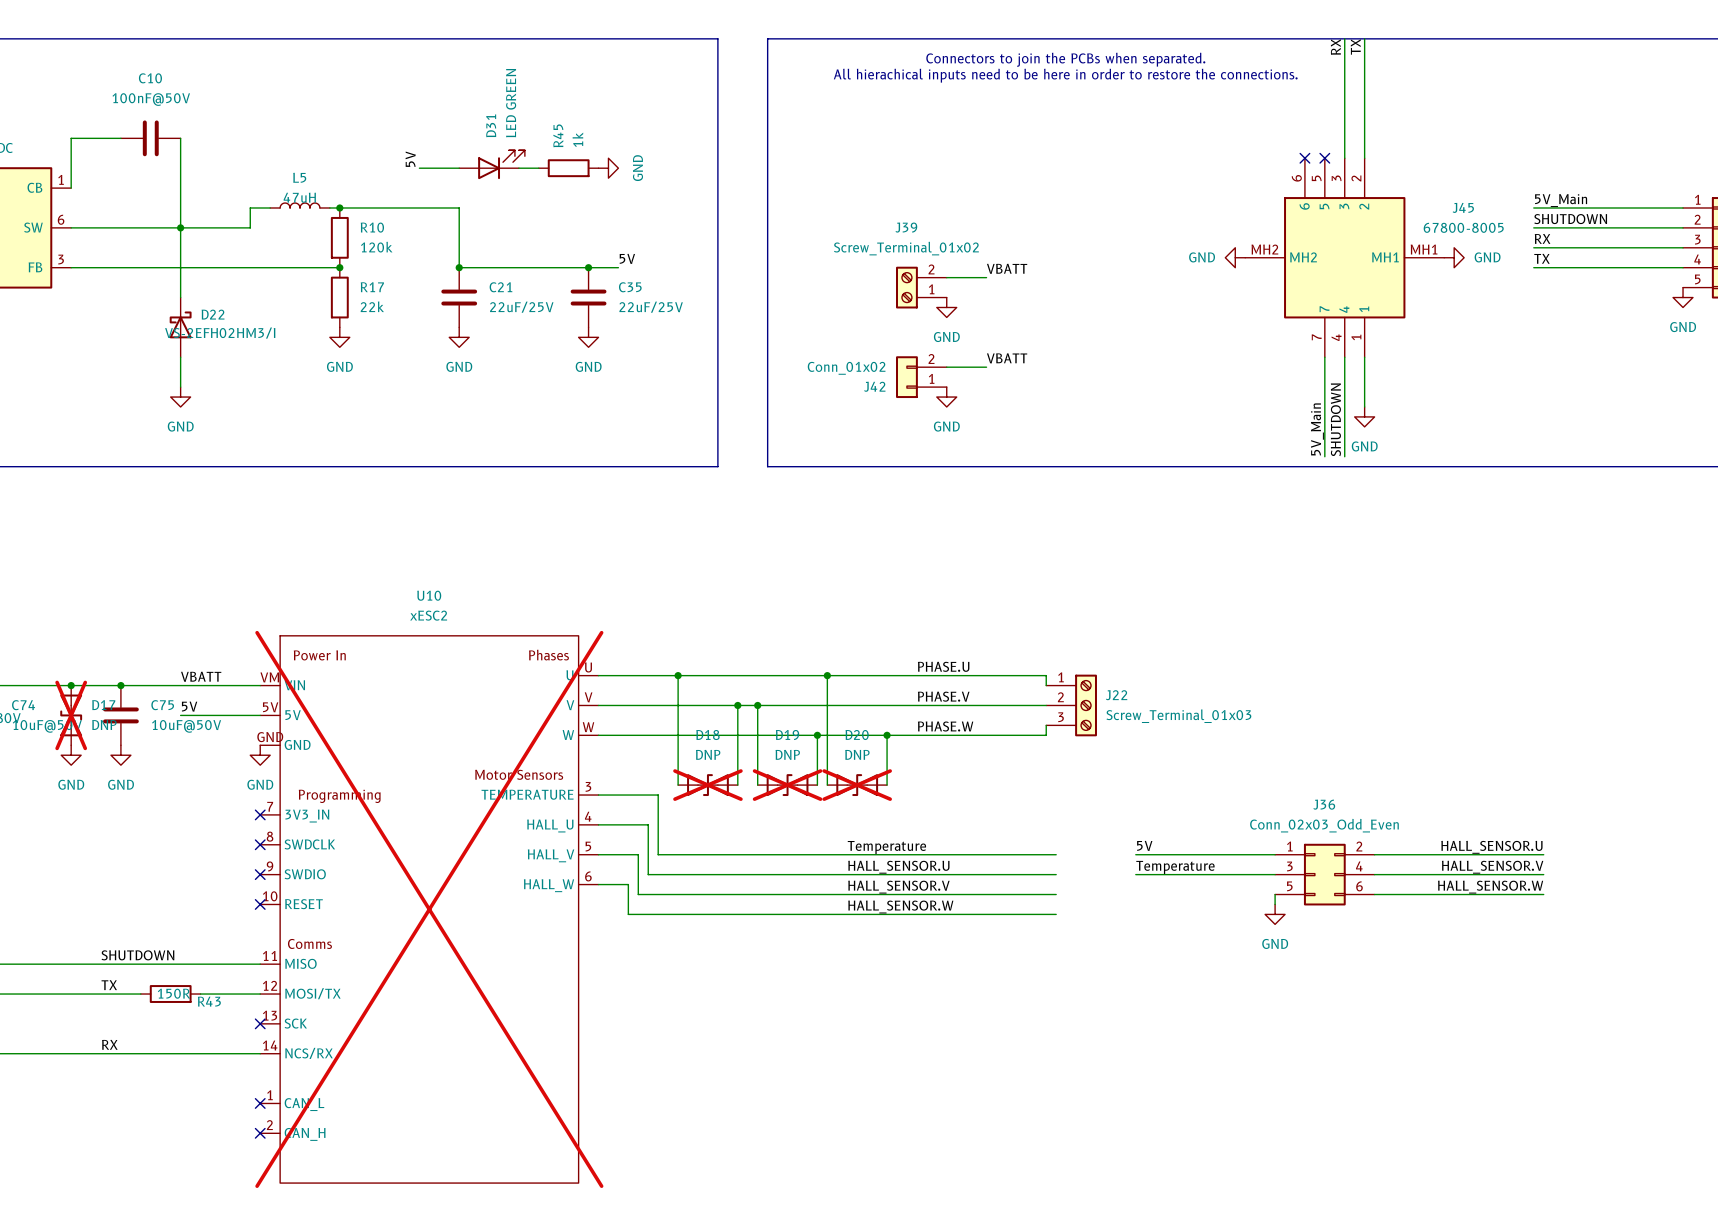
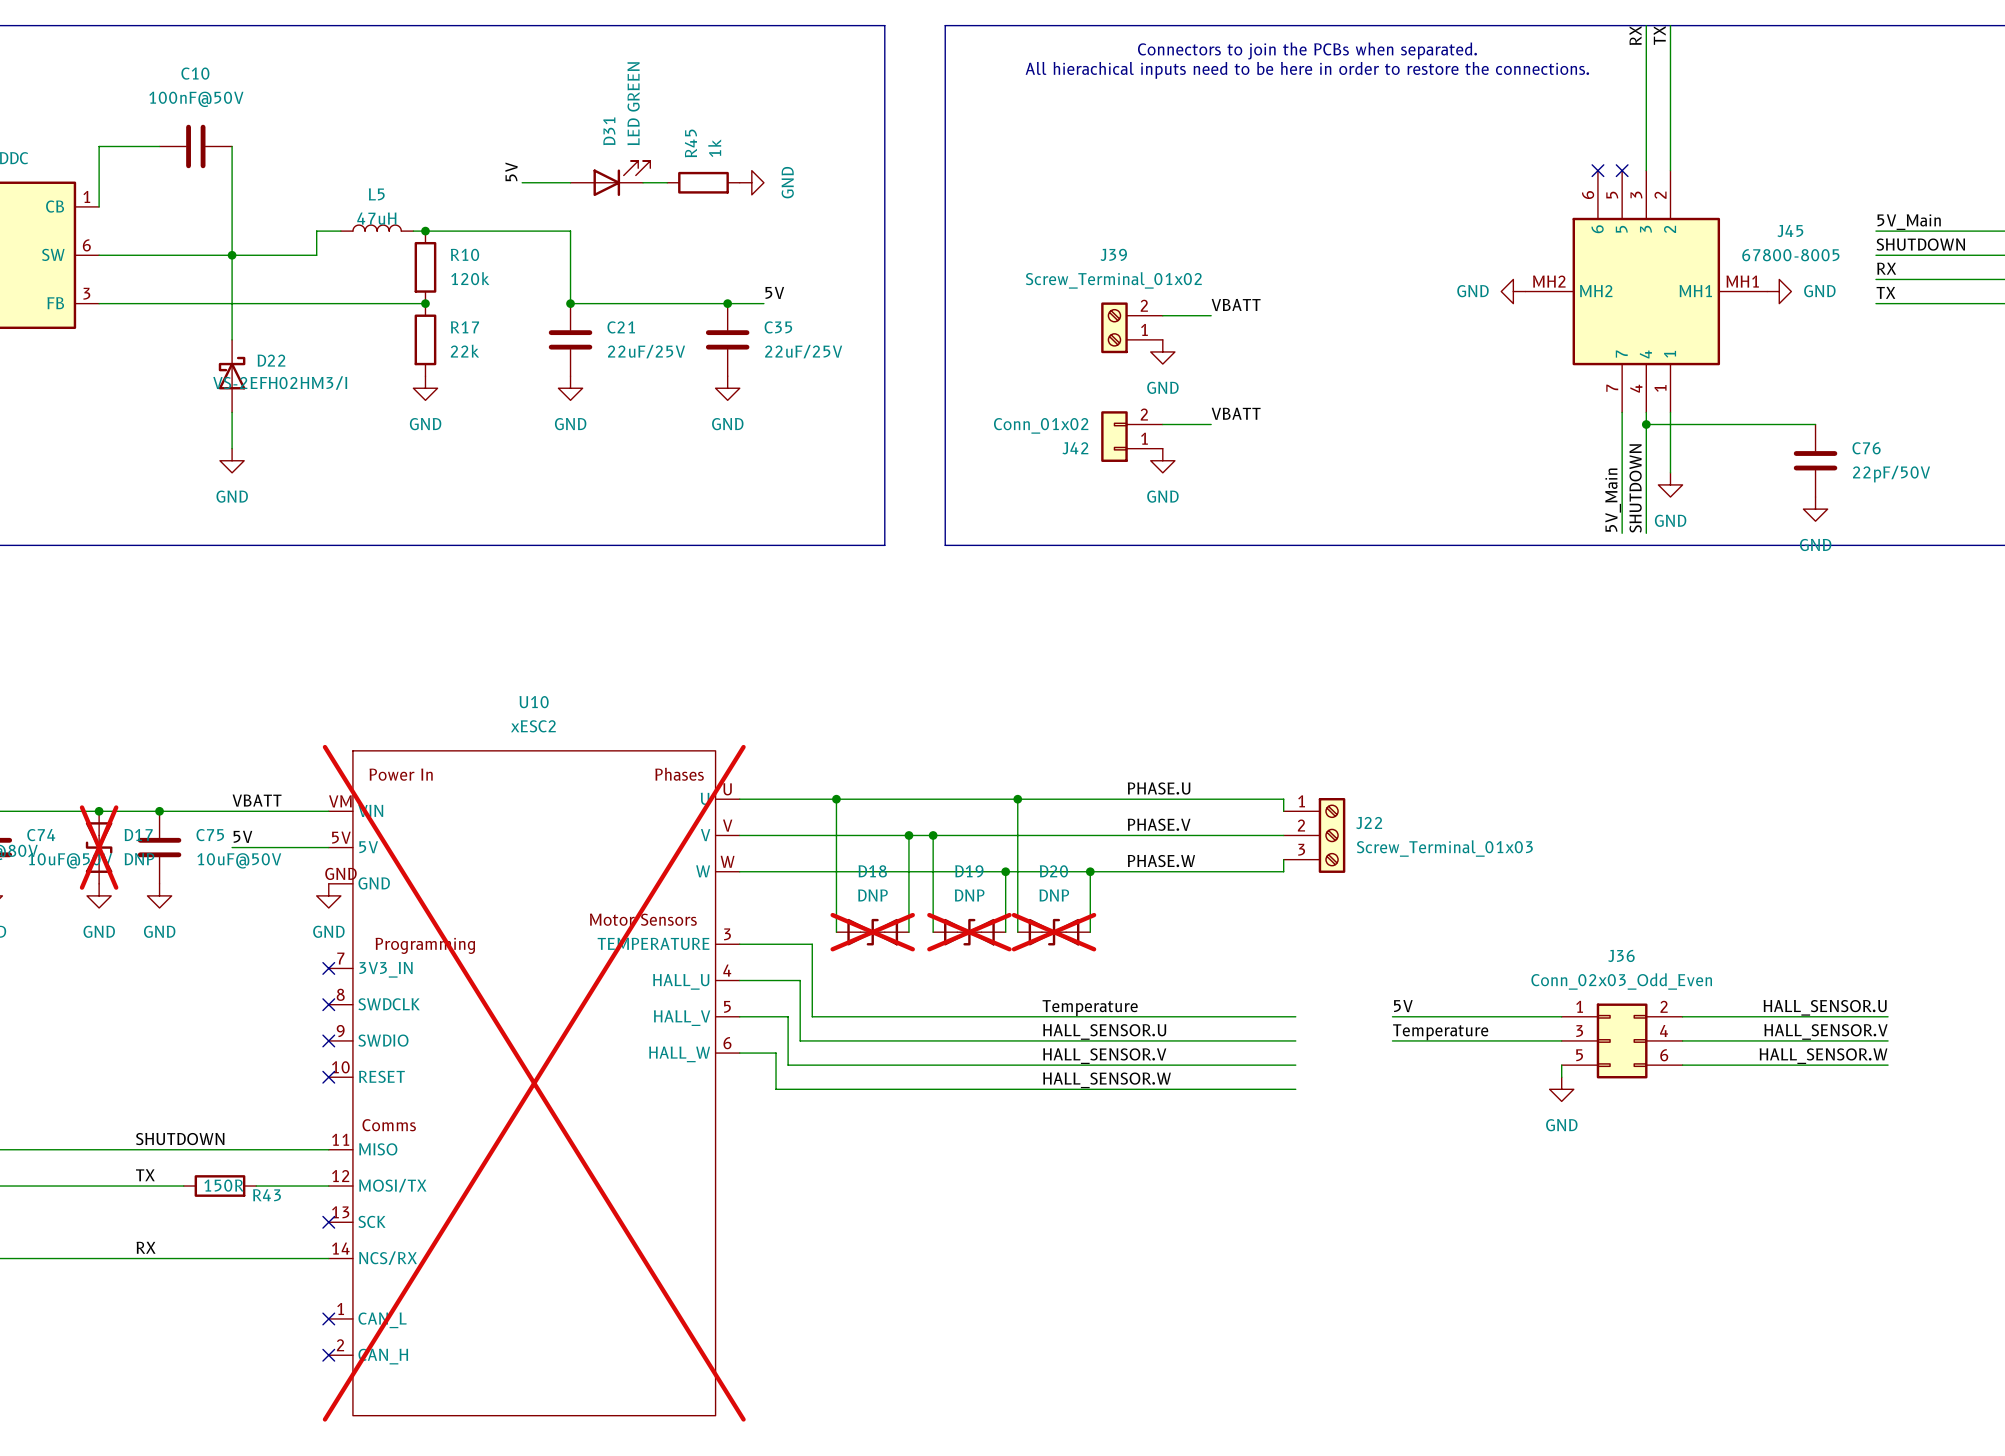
wire: none -> (1646, 424) (1815, 424)
junction: none -> (1646, 424)
C76: none -> 22pF/50V (1815, 460)
power symbol: none -> GND (1815, 509)

